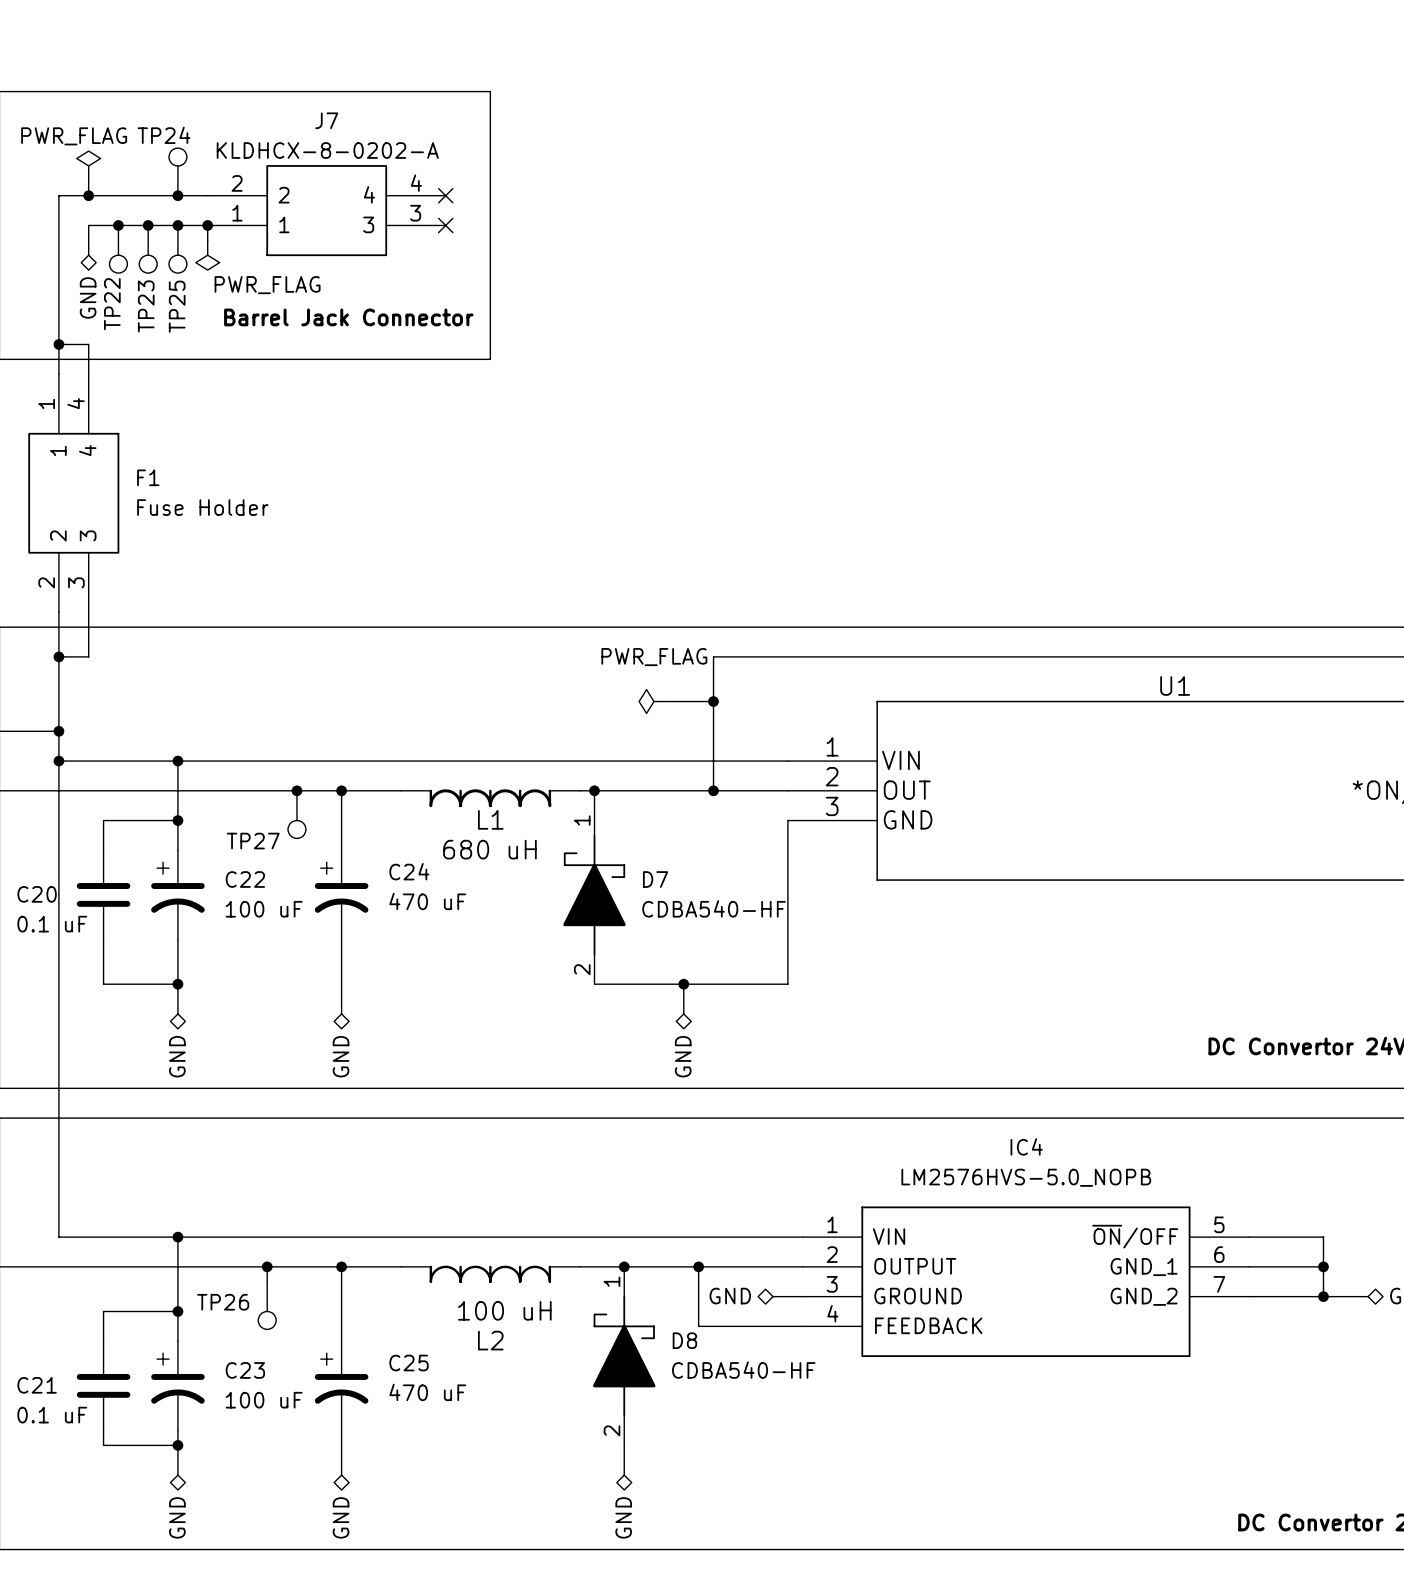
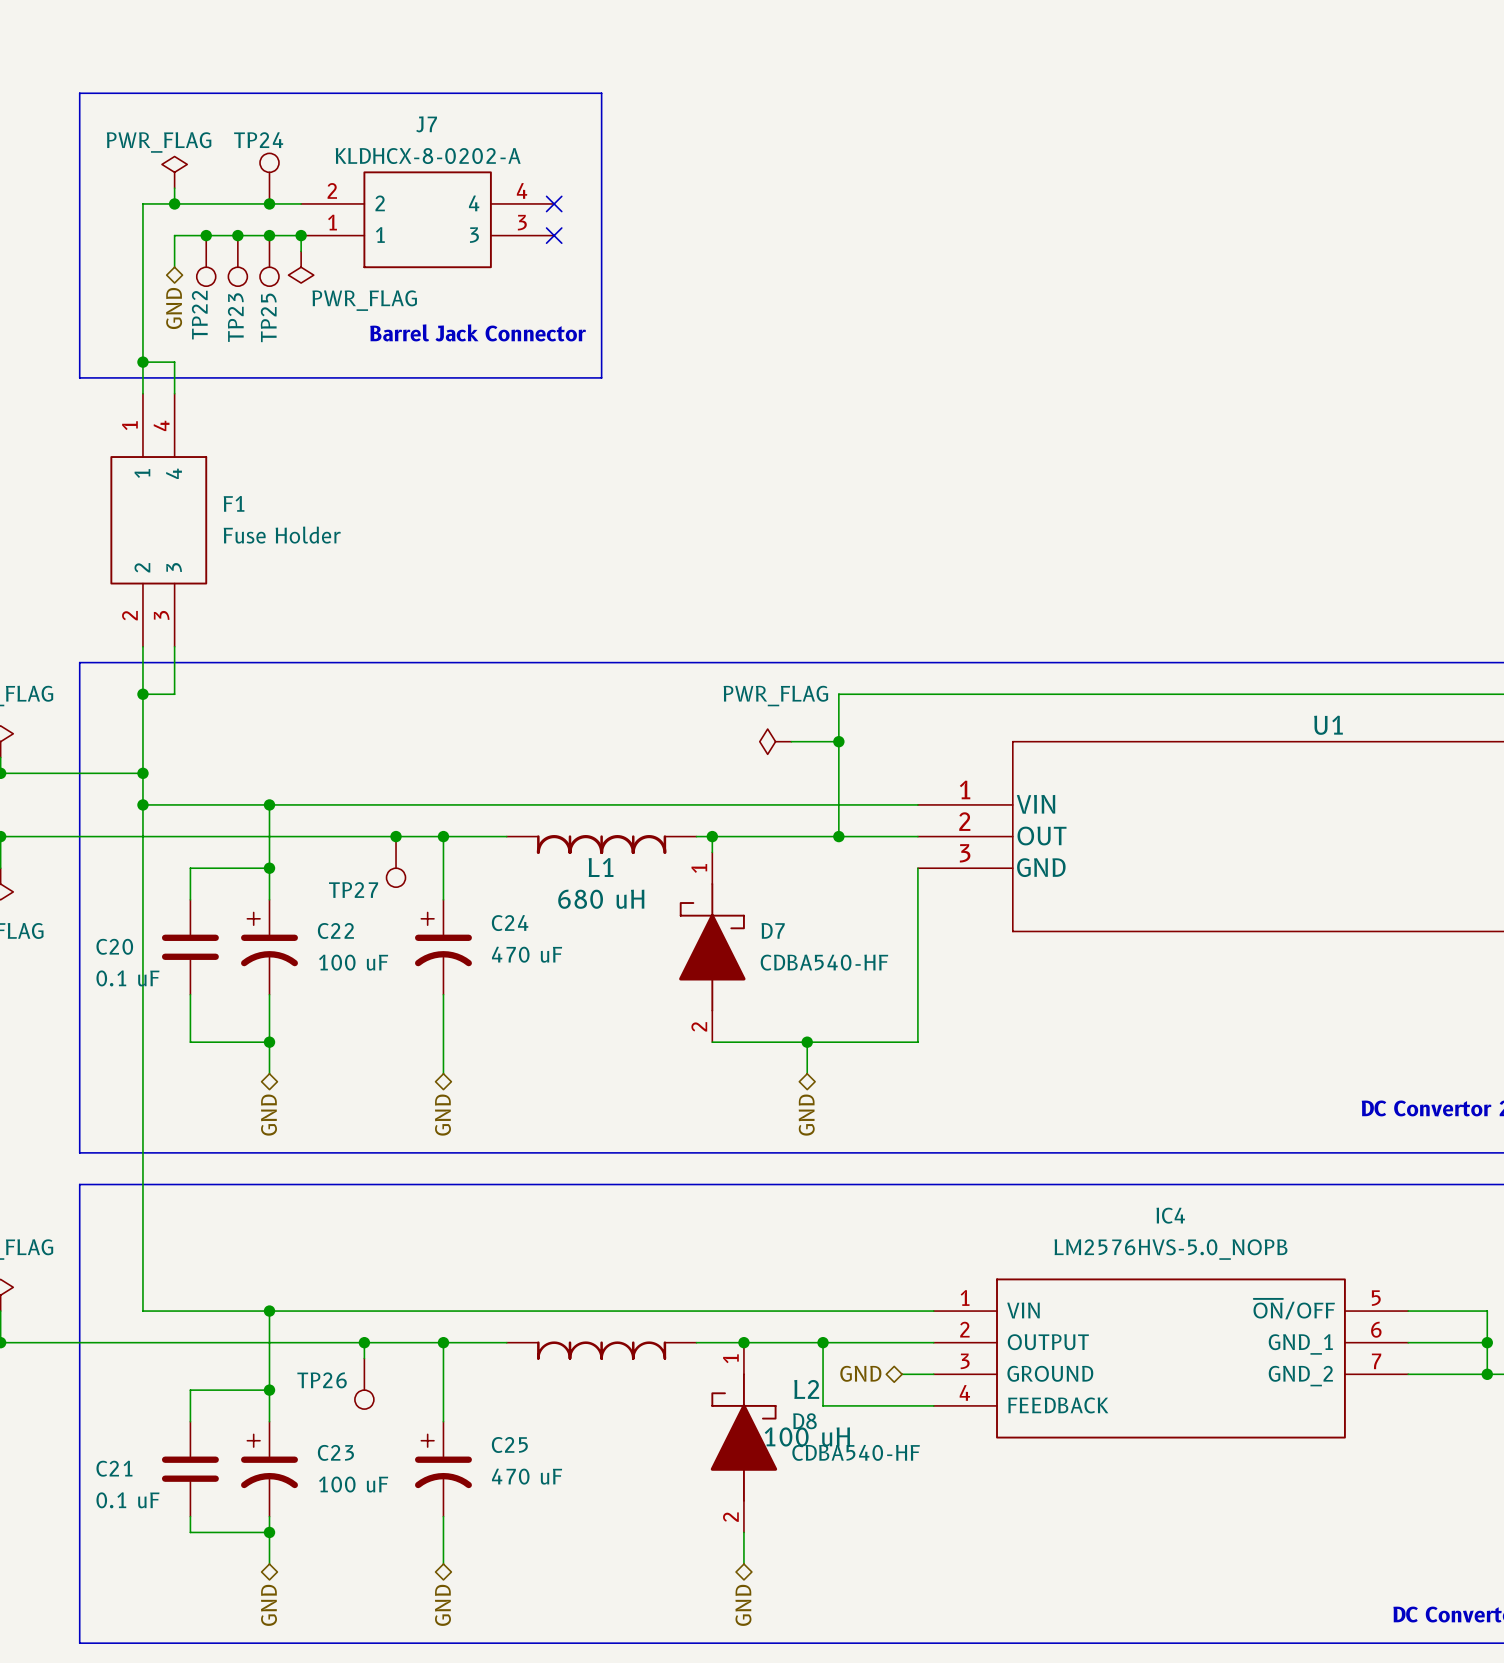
L2 value position: 100 uH (504, 1310) -> 100 uH (807, 1436)
L2 name position: L2 (490, 1340) -> L2 (806, 1389)

